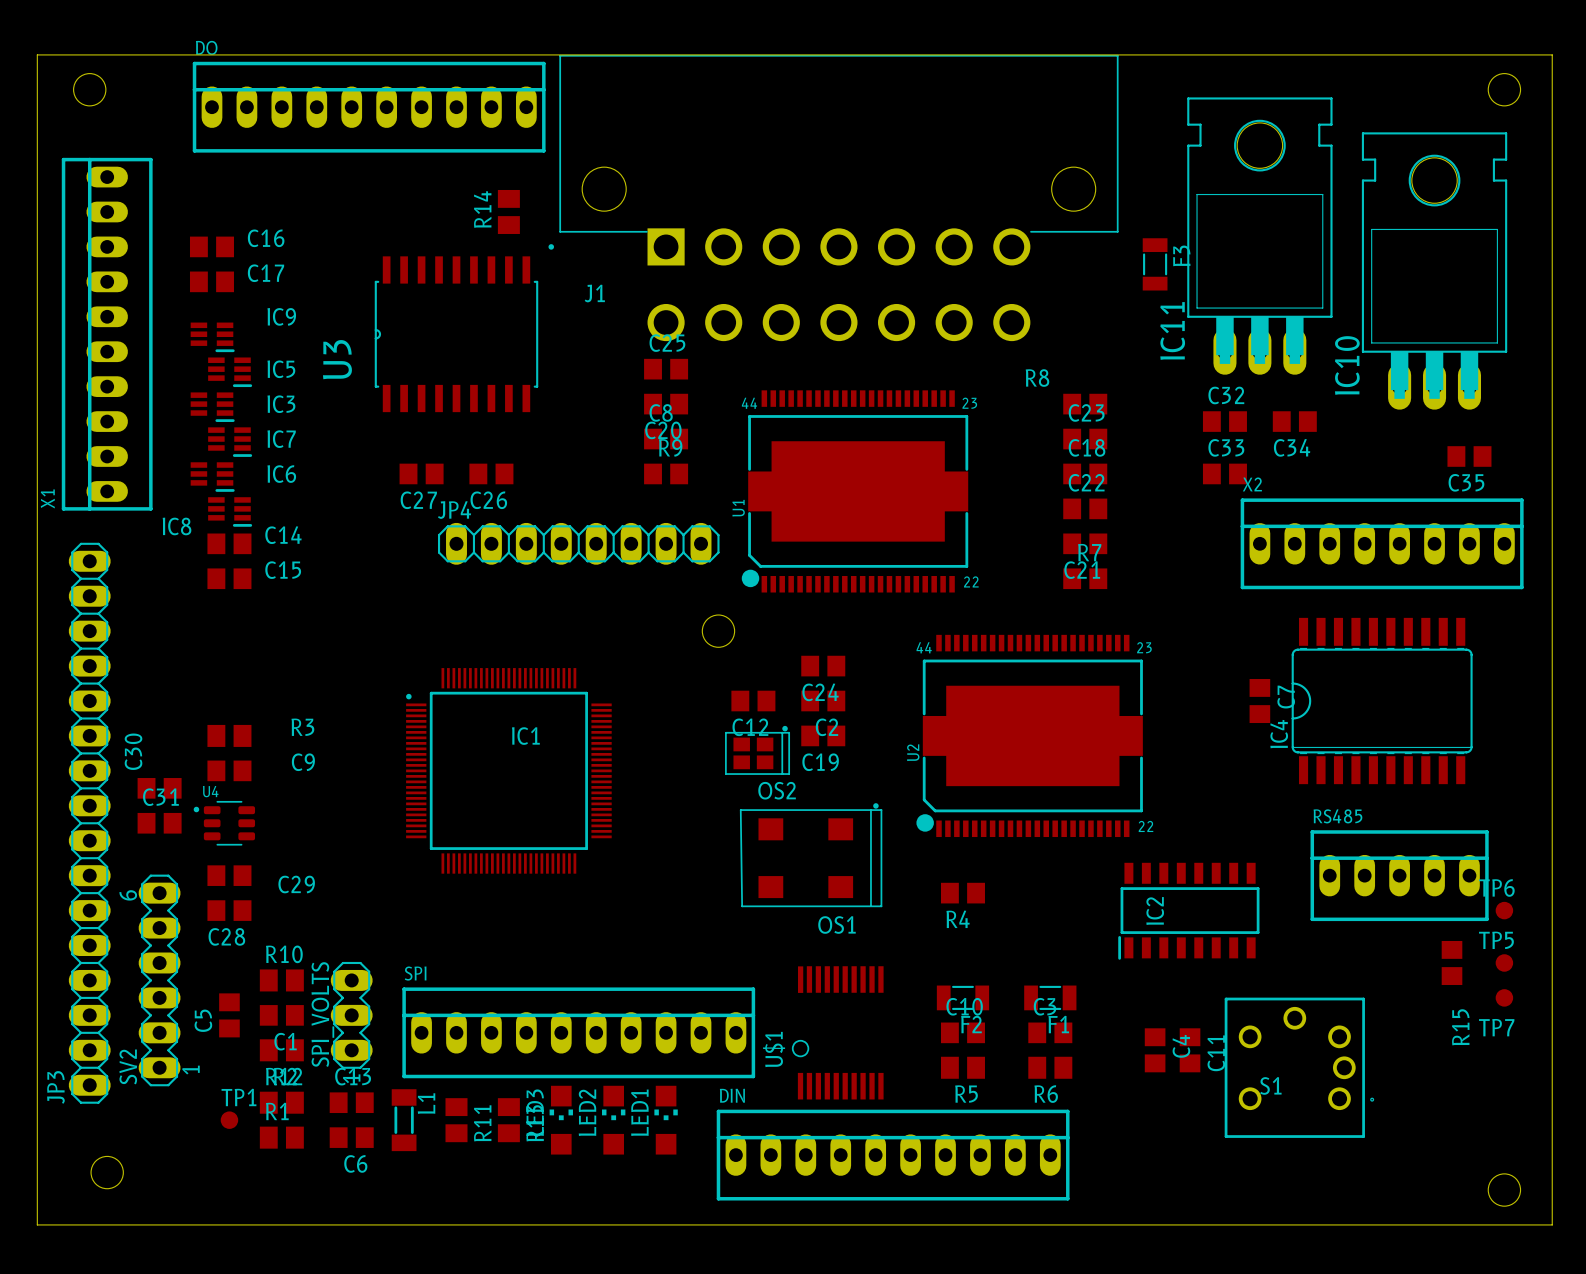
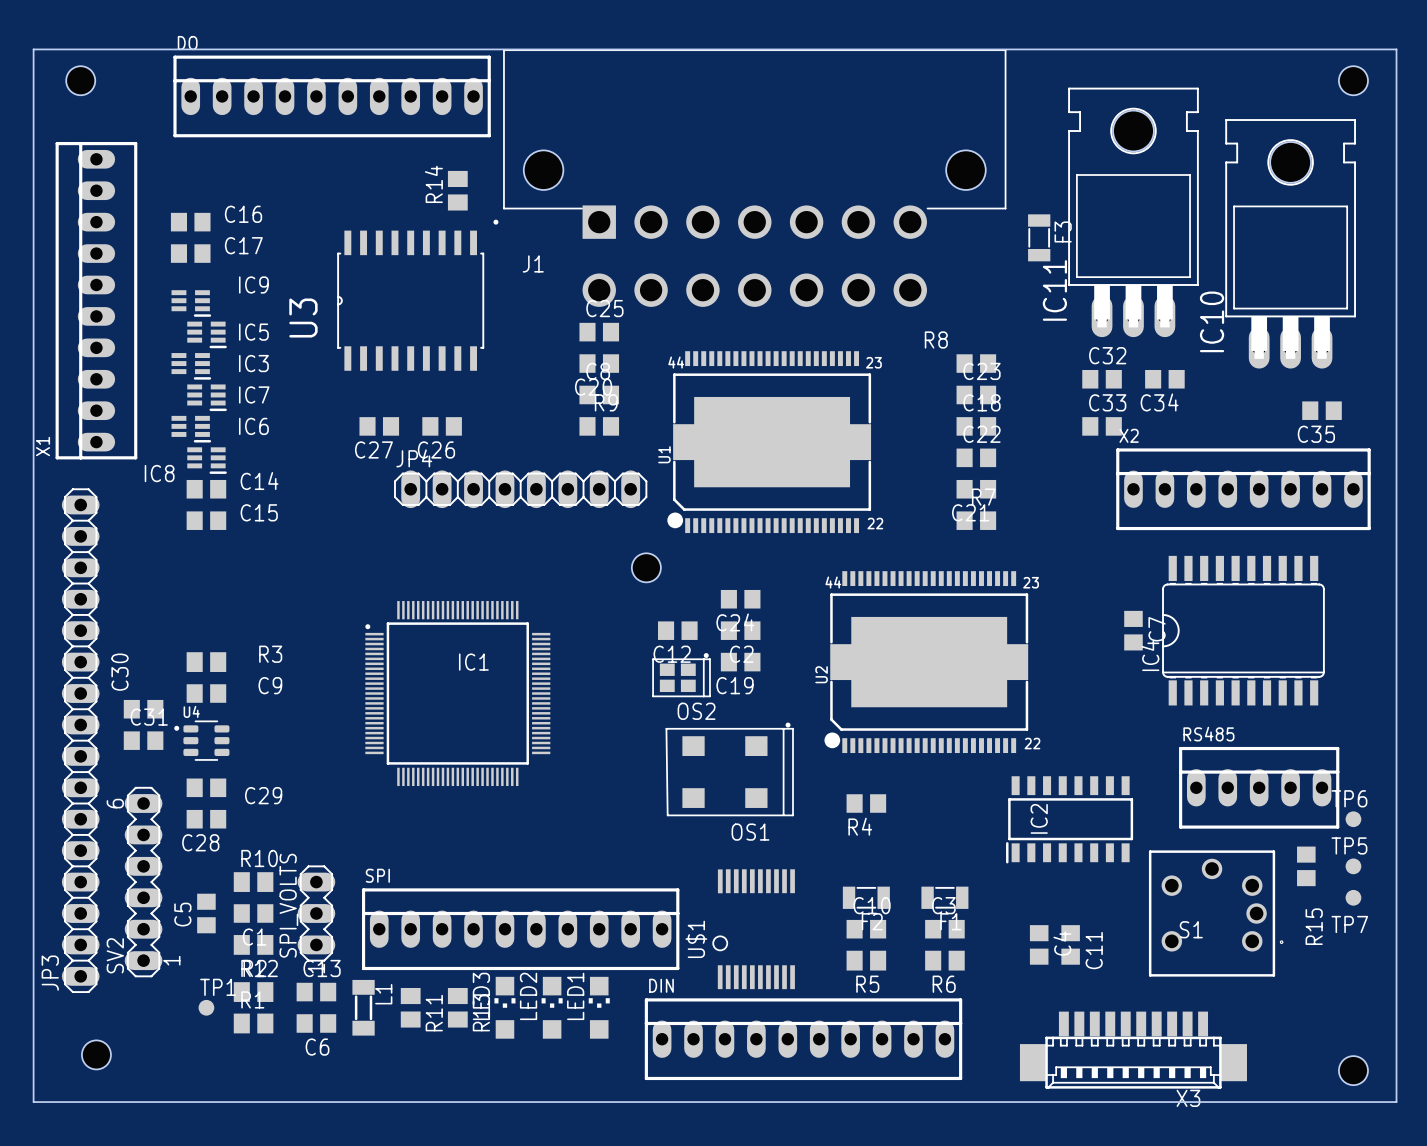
S1 position: (1299, 1067) -> (1216, 913)
X3: none -> (1133, 1050)

